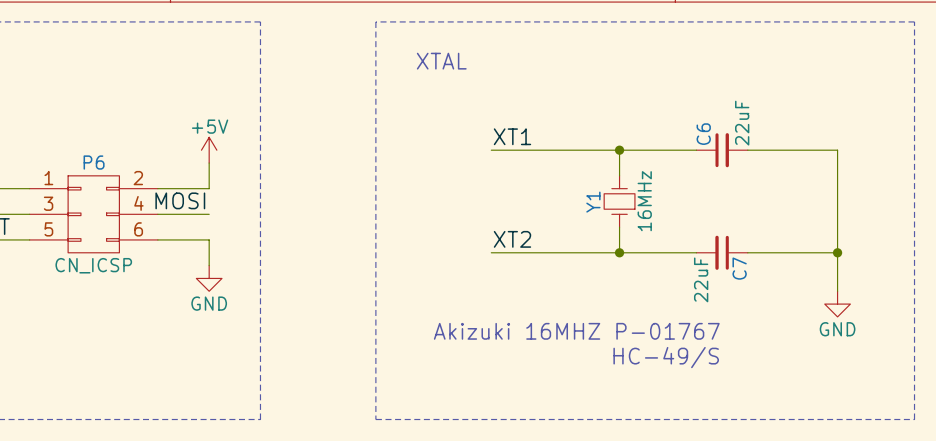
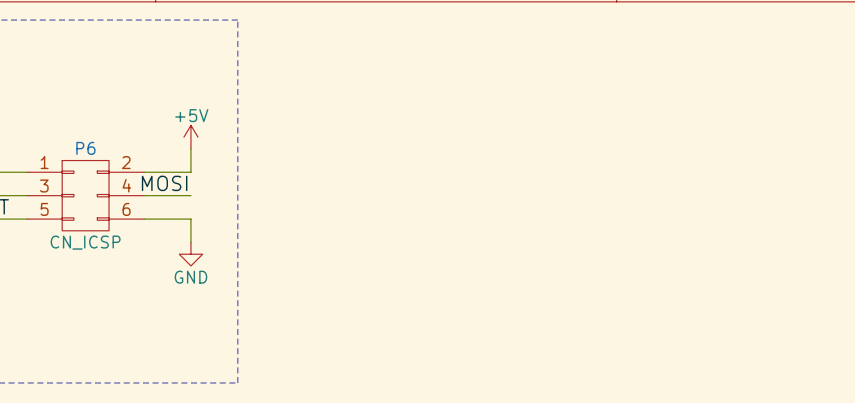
line: (375, 21) (375, 419) (914, 419) (914, 21) (375, 21) -> none
text: XTAL (441, 61) -> none
label: XT1 (512, 136) -> none
wire: (491, 150) (696, 150) -> none
wire: (619, 150) (619, 175) -> none
junction: (619, 150) -> none
C6: 22uF (722, 150) -> none
wire: (747, 150) (837, 150) (837, 291) -> none
Y1: 16MHz (619, 201) -> none
wire: (619, 227) (619, 252) -> none
label: XT2 (512, 239) -> none
wire: (491, 252) (696, 252) -> none
junction: (619, 252) -> none
C7: 22uF (722, 252) -> none
wire: (747, 252) (837, 252) -> none
junction: (837, 252) -> none
power symbol: GND (837, 304) -> none
text: Akizuki 16MHZ P-01767 (576, 331) -> none
text: HC-49/S (666, 357) -> none

